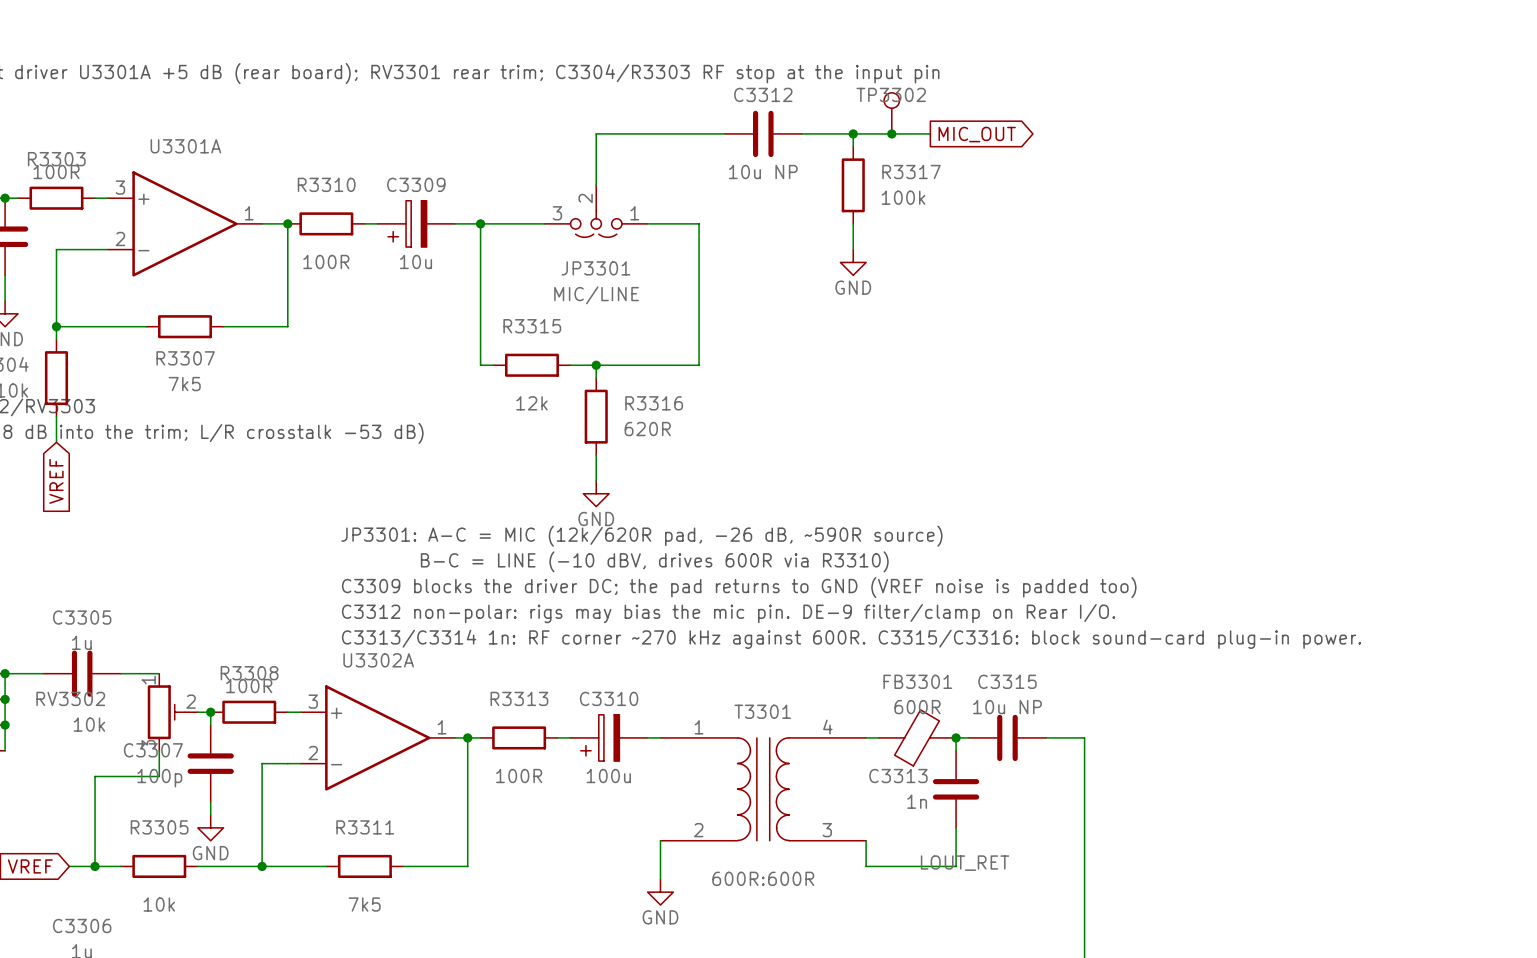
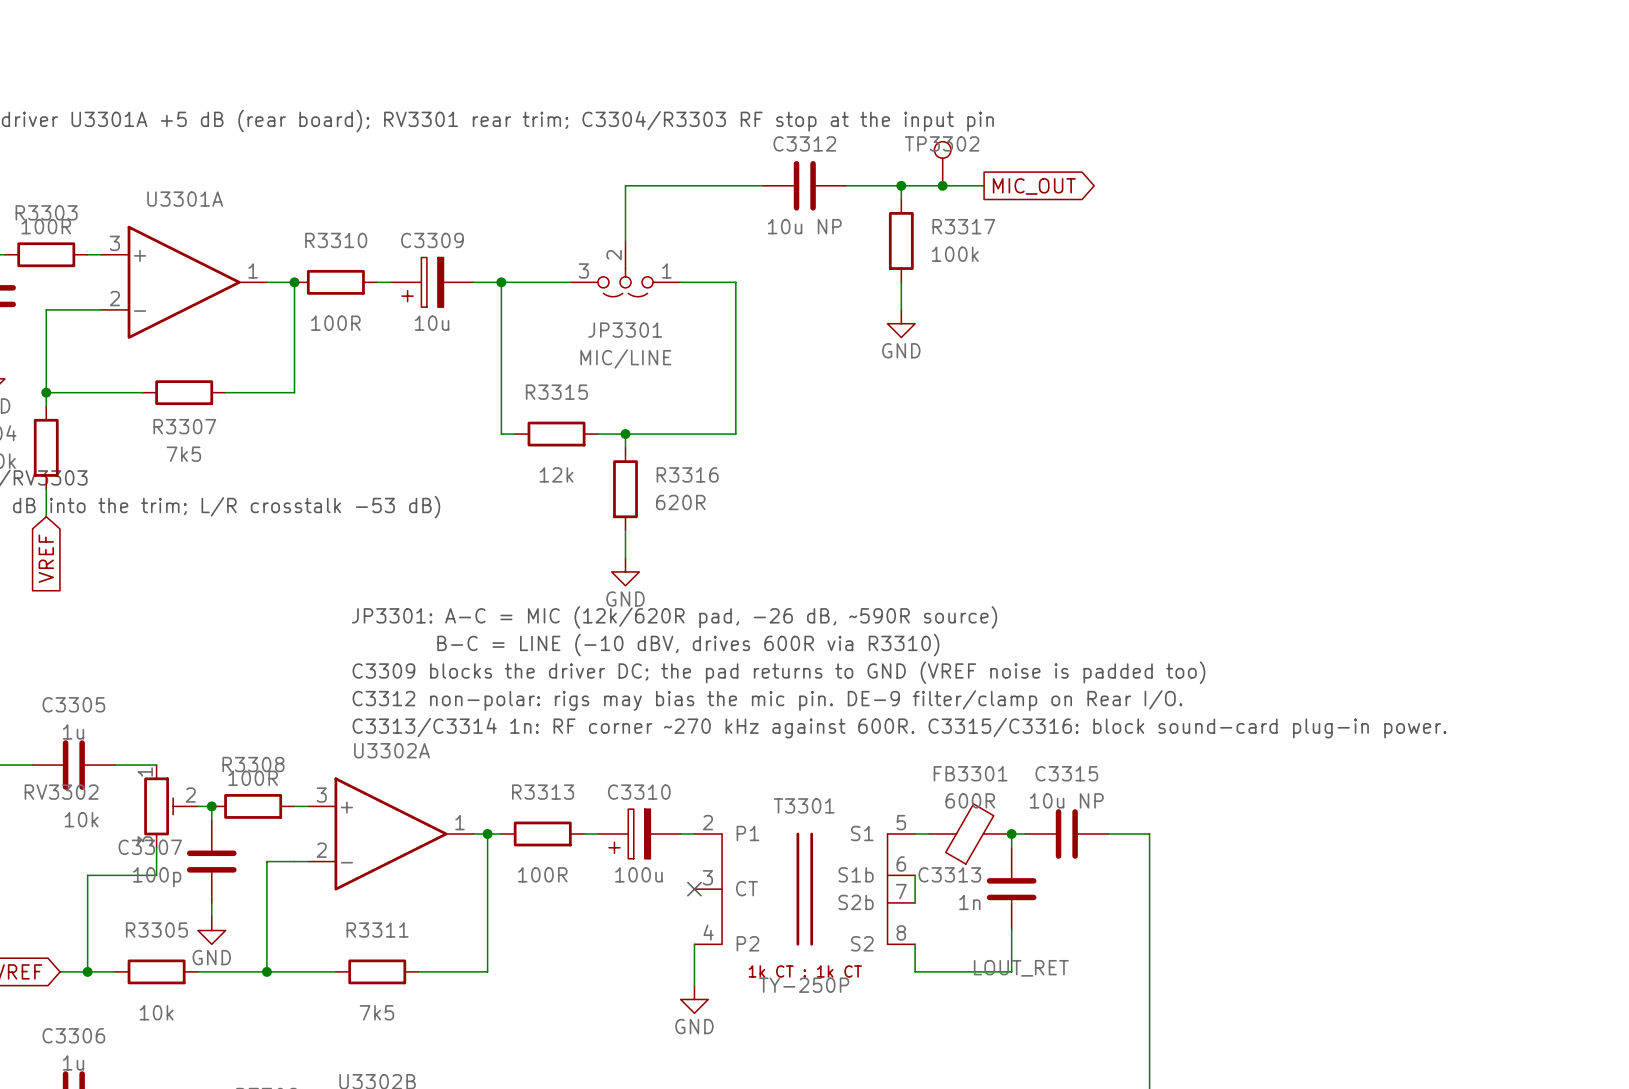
T3301 symbol: [660, 737, 867, 841] -> [694, 832, 916, 946]
wire: none -> (915, 875) (915, 902)
no-connect mark: none -> (694, 889)
T3301 value: 600R:600R (763, 878) -> TY-250P (804, 985)

